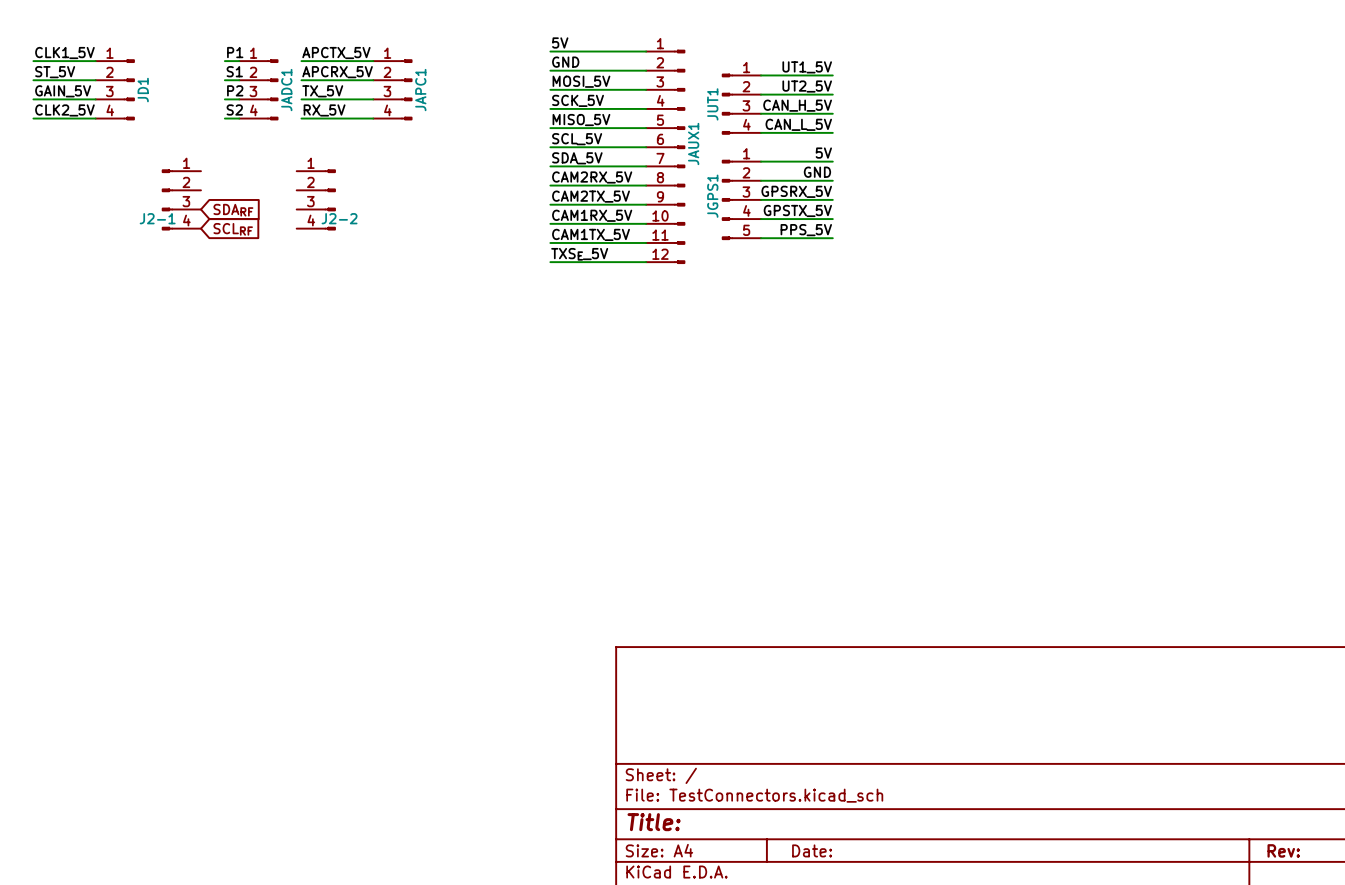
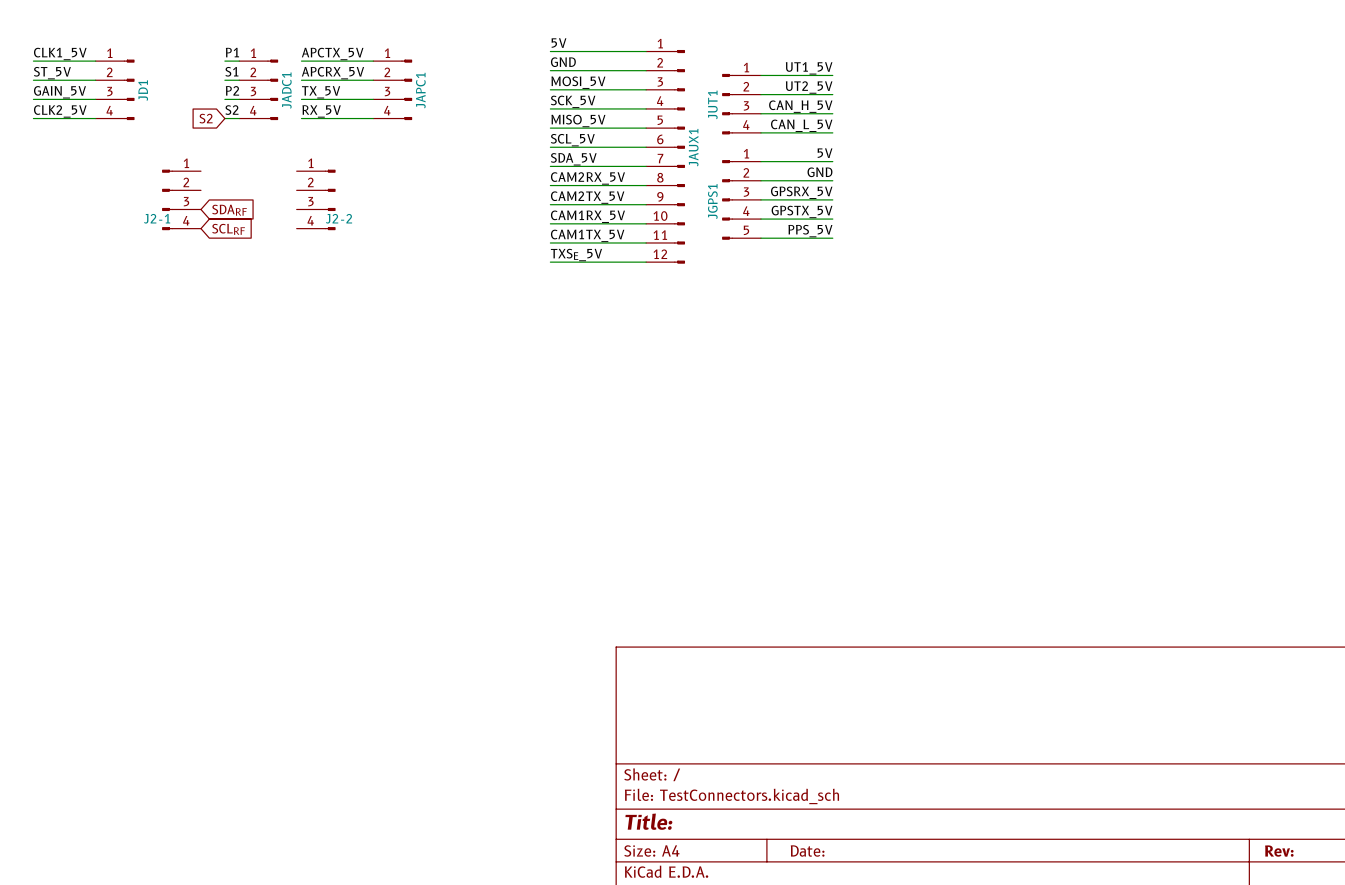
global label: none -> S2 (206, 118)

